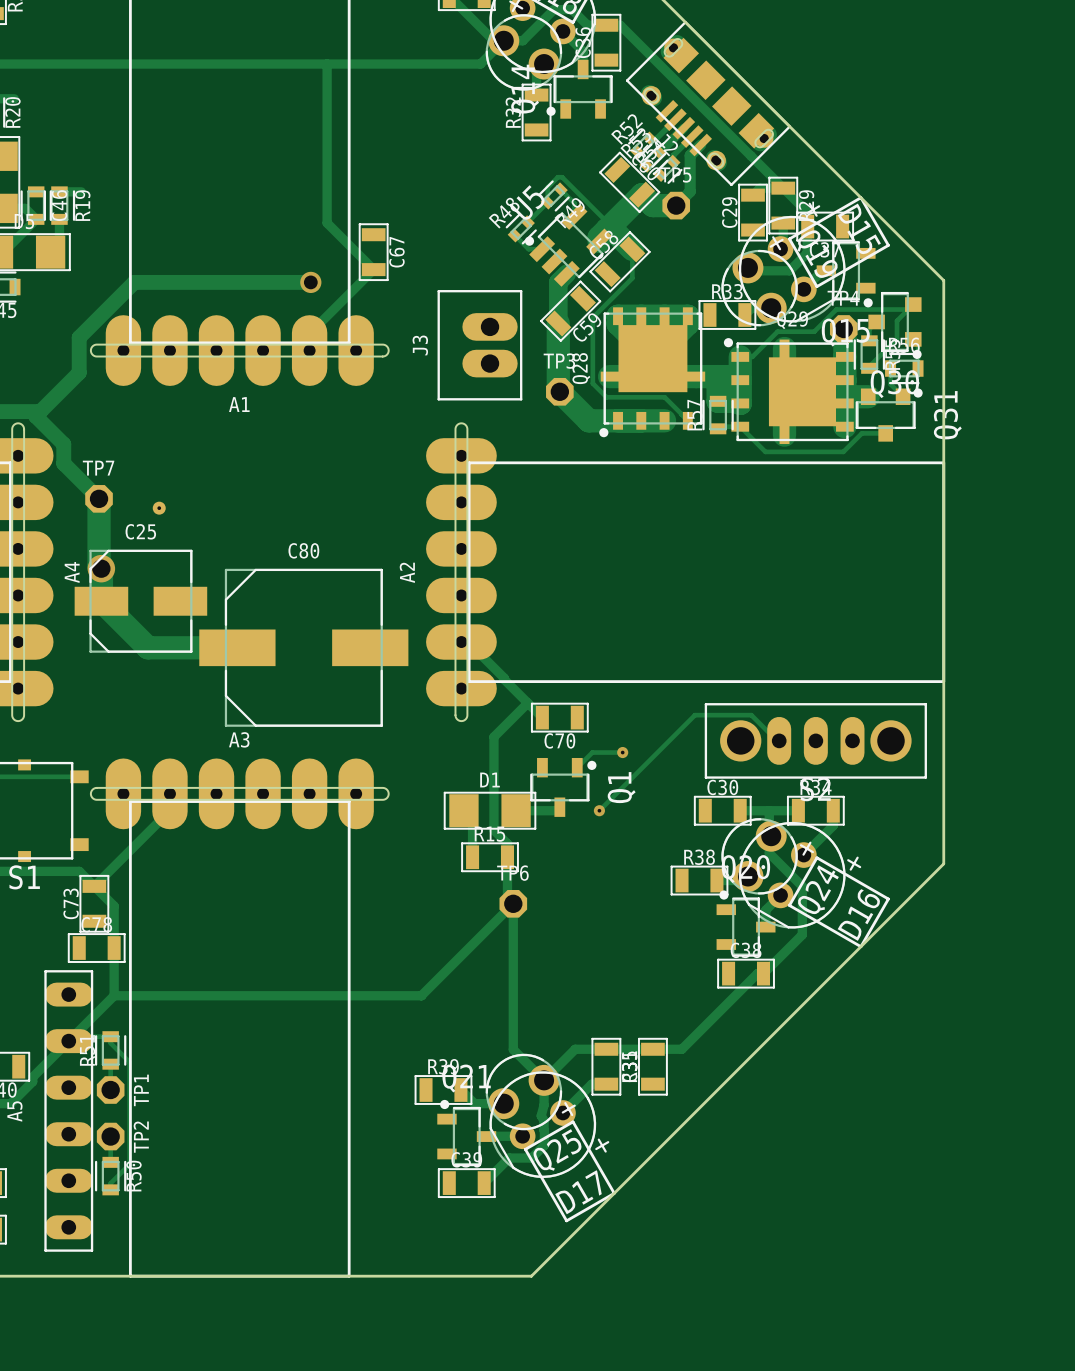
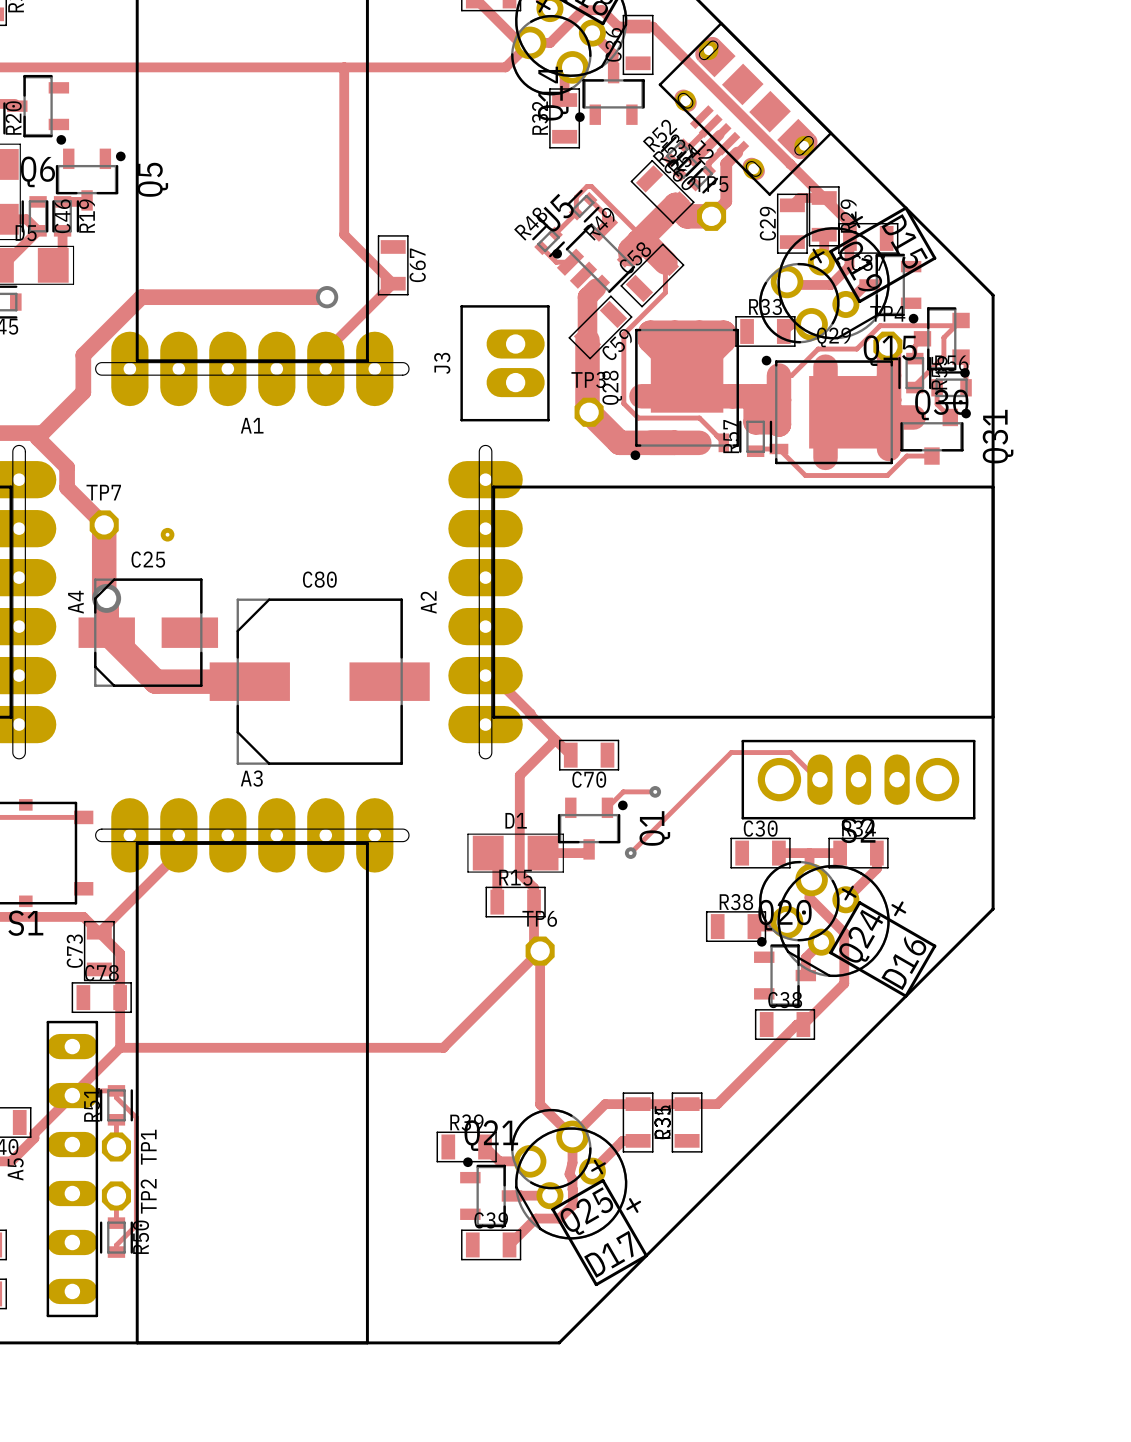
Q6: none -> (38, 109)
Q5: none -> (90, 179)

